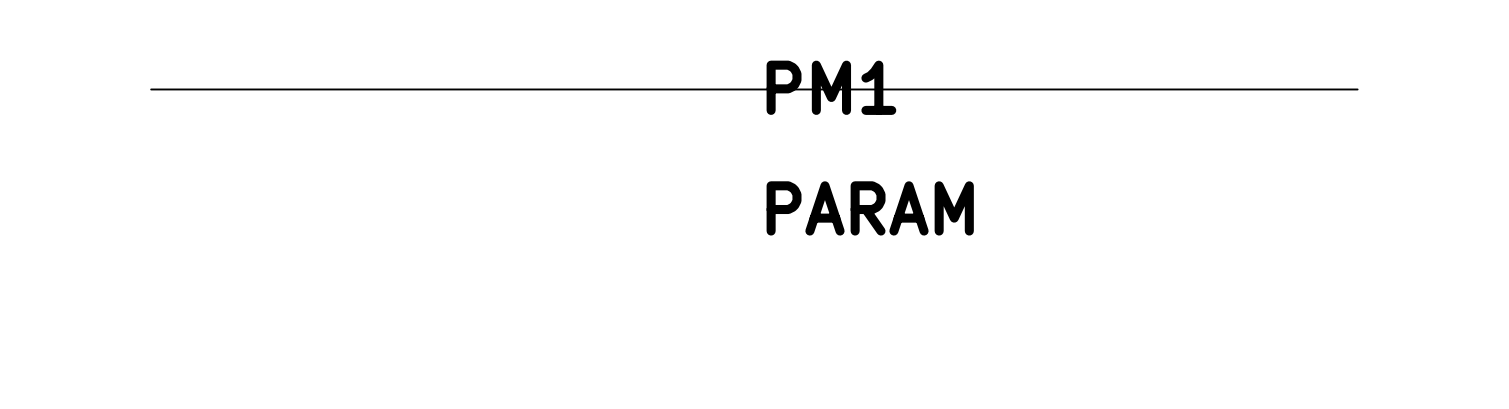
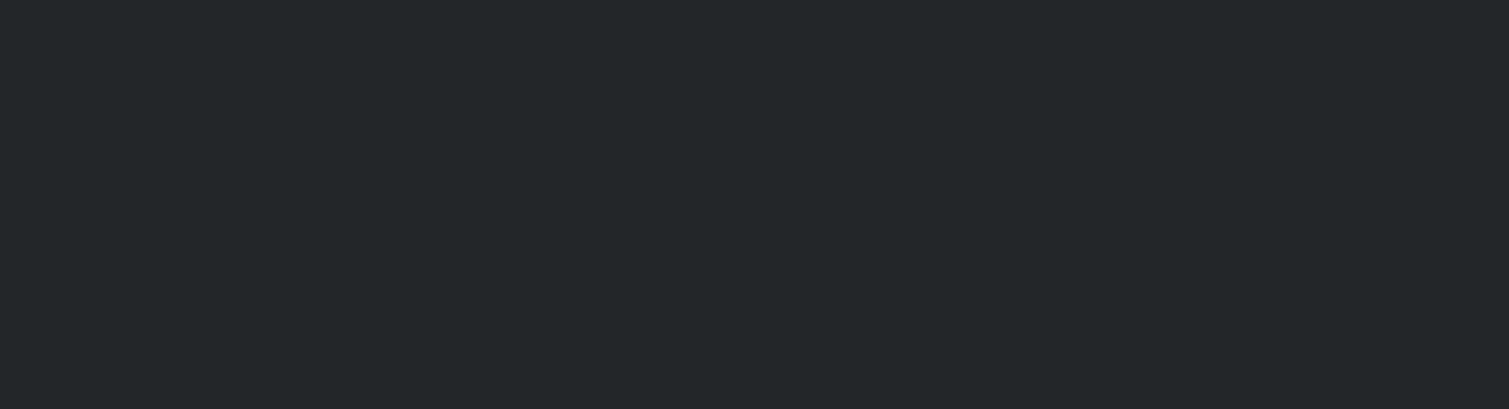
PM1: PARAM (754, 89) -> none

